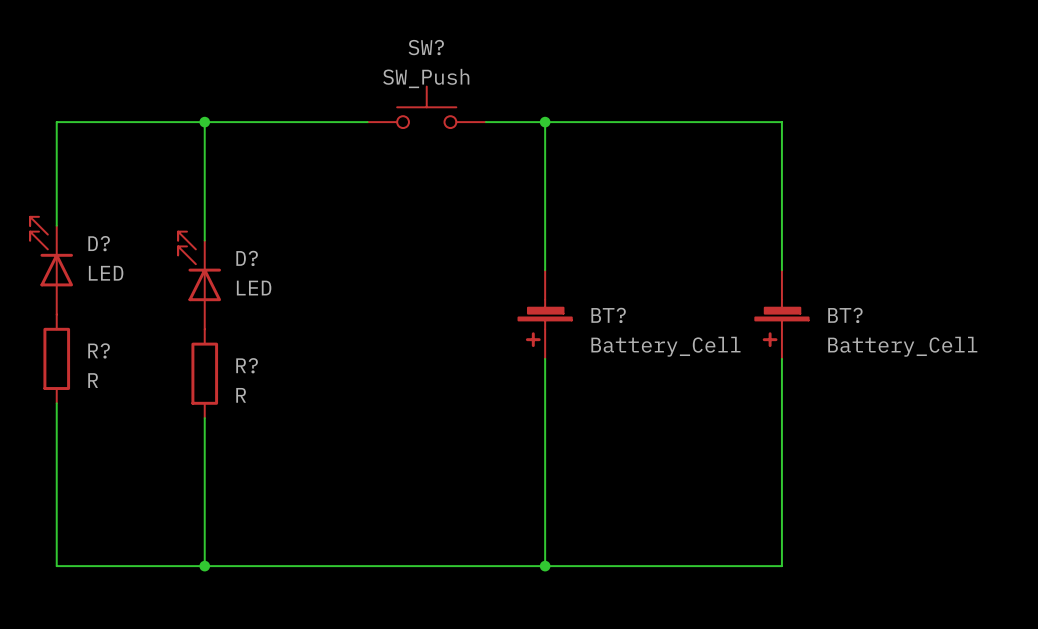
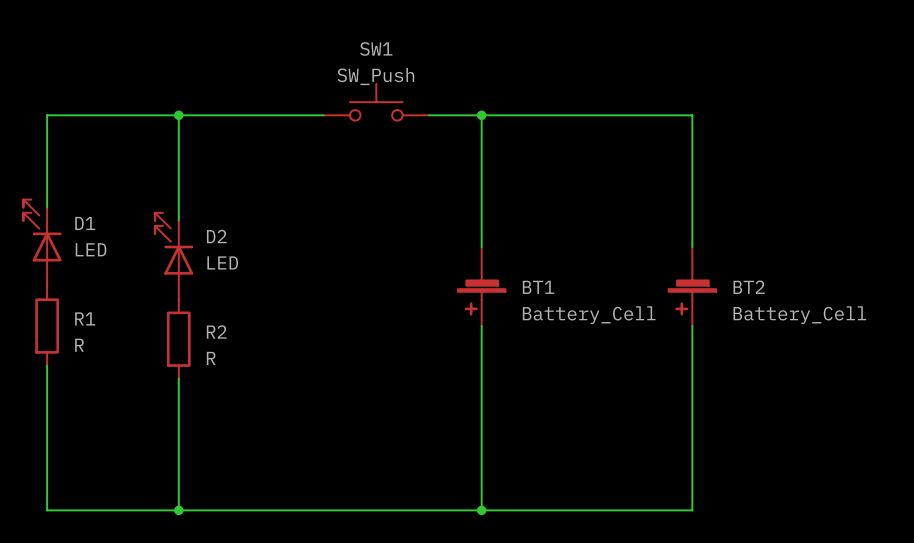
SW? name: SW? (426, 47) -> SW1 (376, 48)
D? name: D? (99, 243) -> D1 (85, 223)
D? name: D? (247, 258) -> D2 (216, 236)
BT? name: BT? (608, 315) -> BT1 (538, 287)
BT? name: BT? (845, 315) -> BT2 (749, 287)
R? name: R? (99, 350) -> R1 (85, 318)
R? name: R? (247, 365) -> R2 (216, 331)

